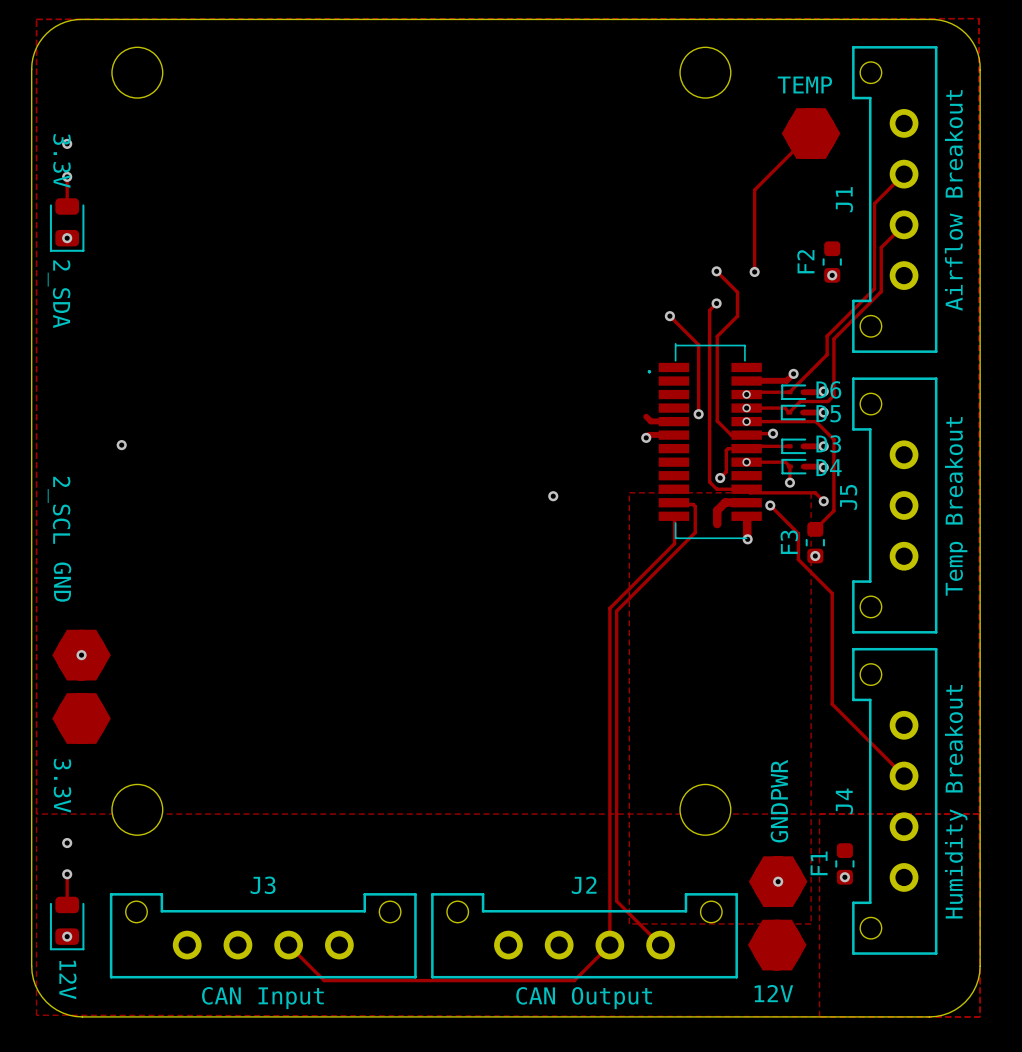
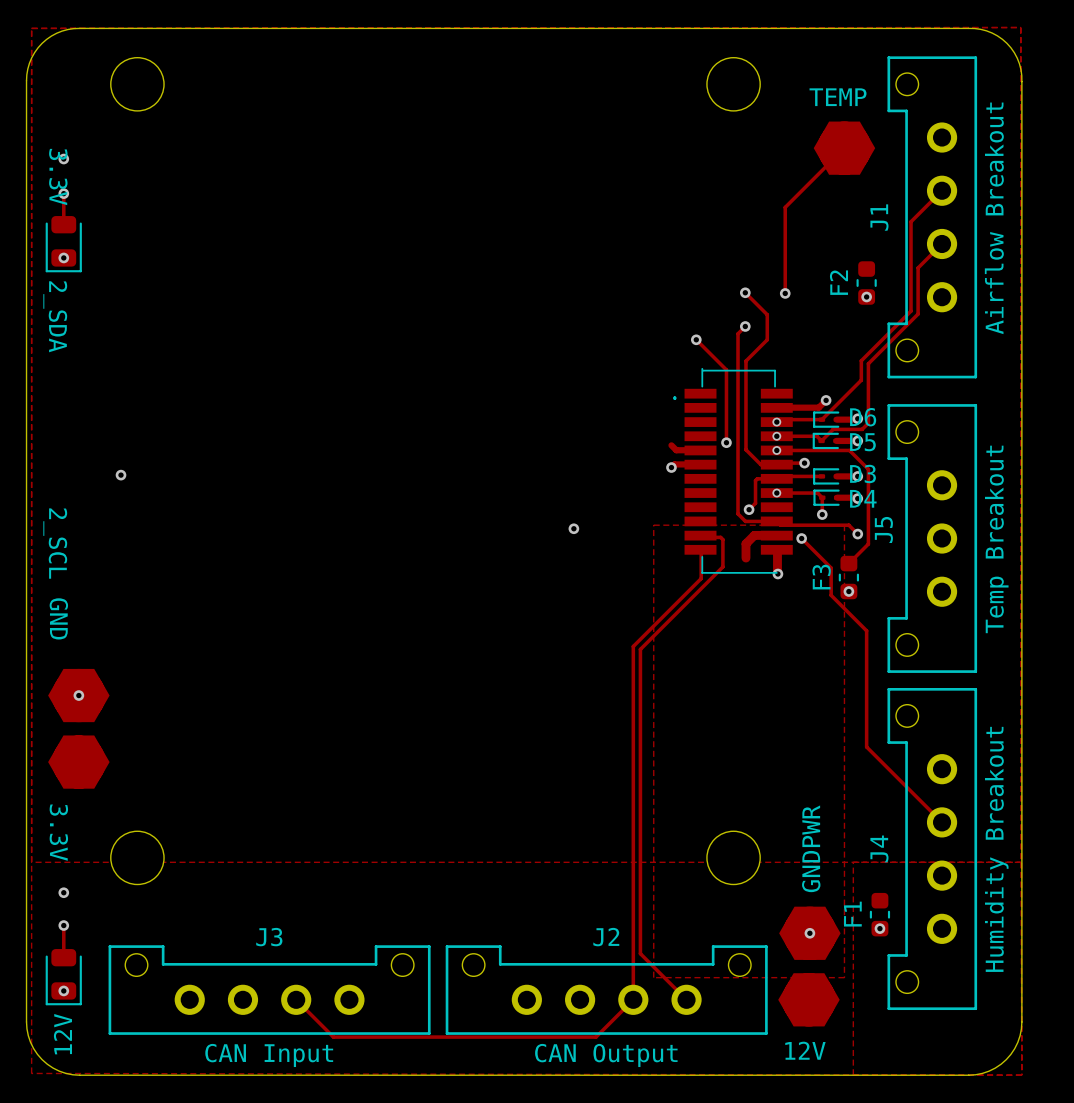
part value rotation: 0° (67, 979) -> 180° (62, 1034)

